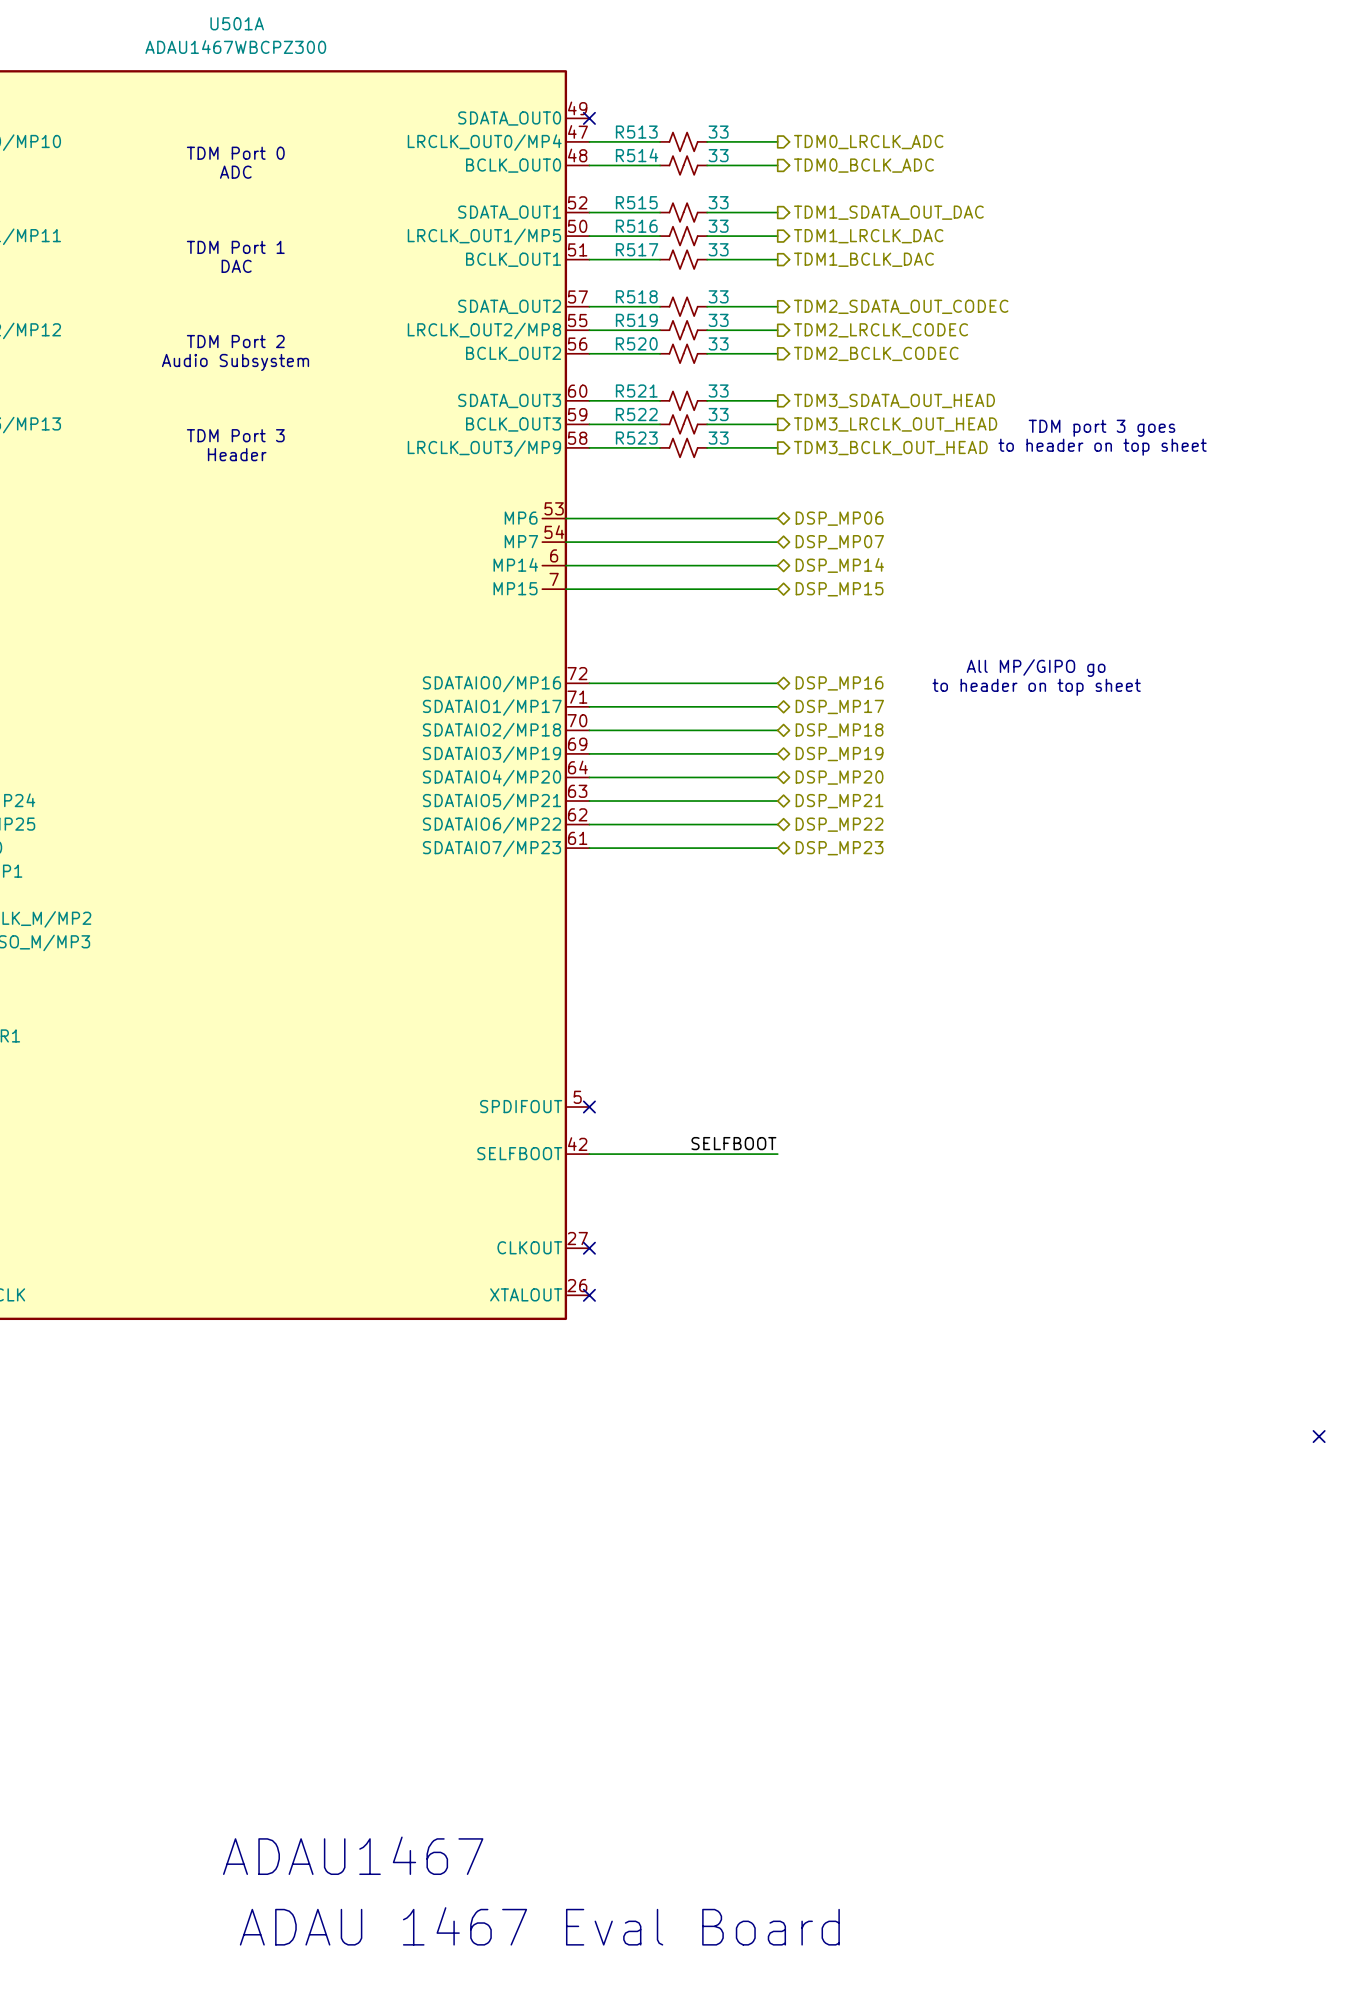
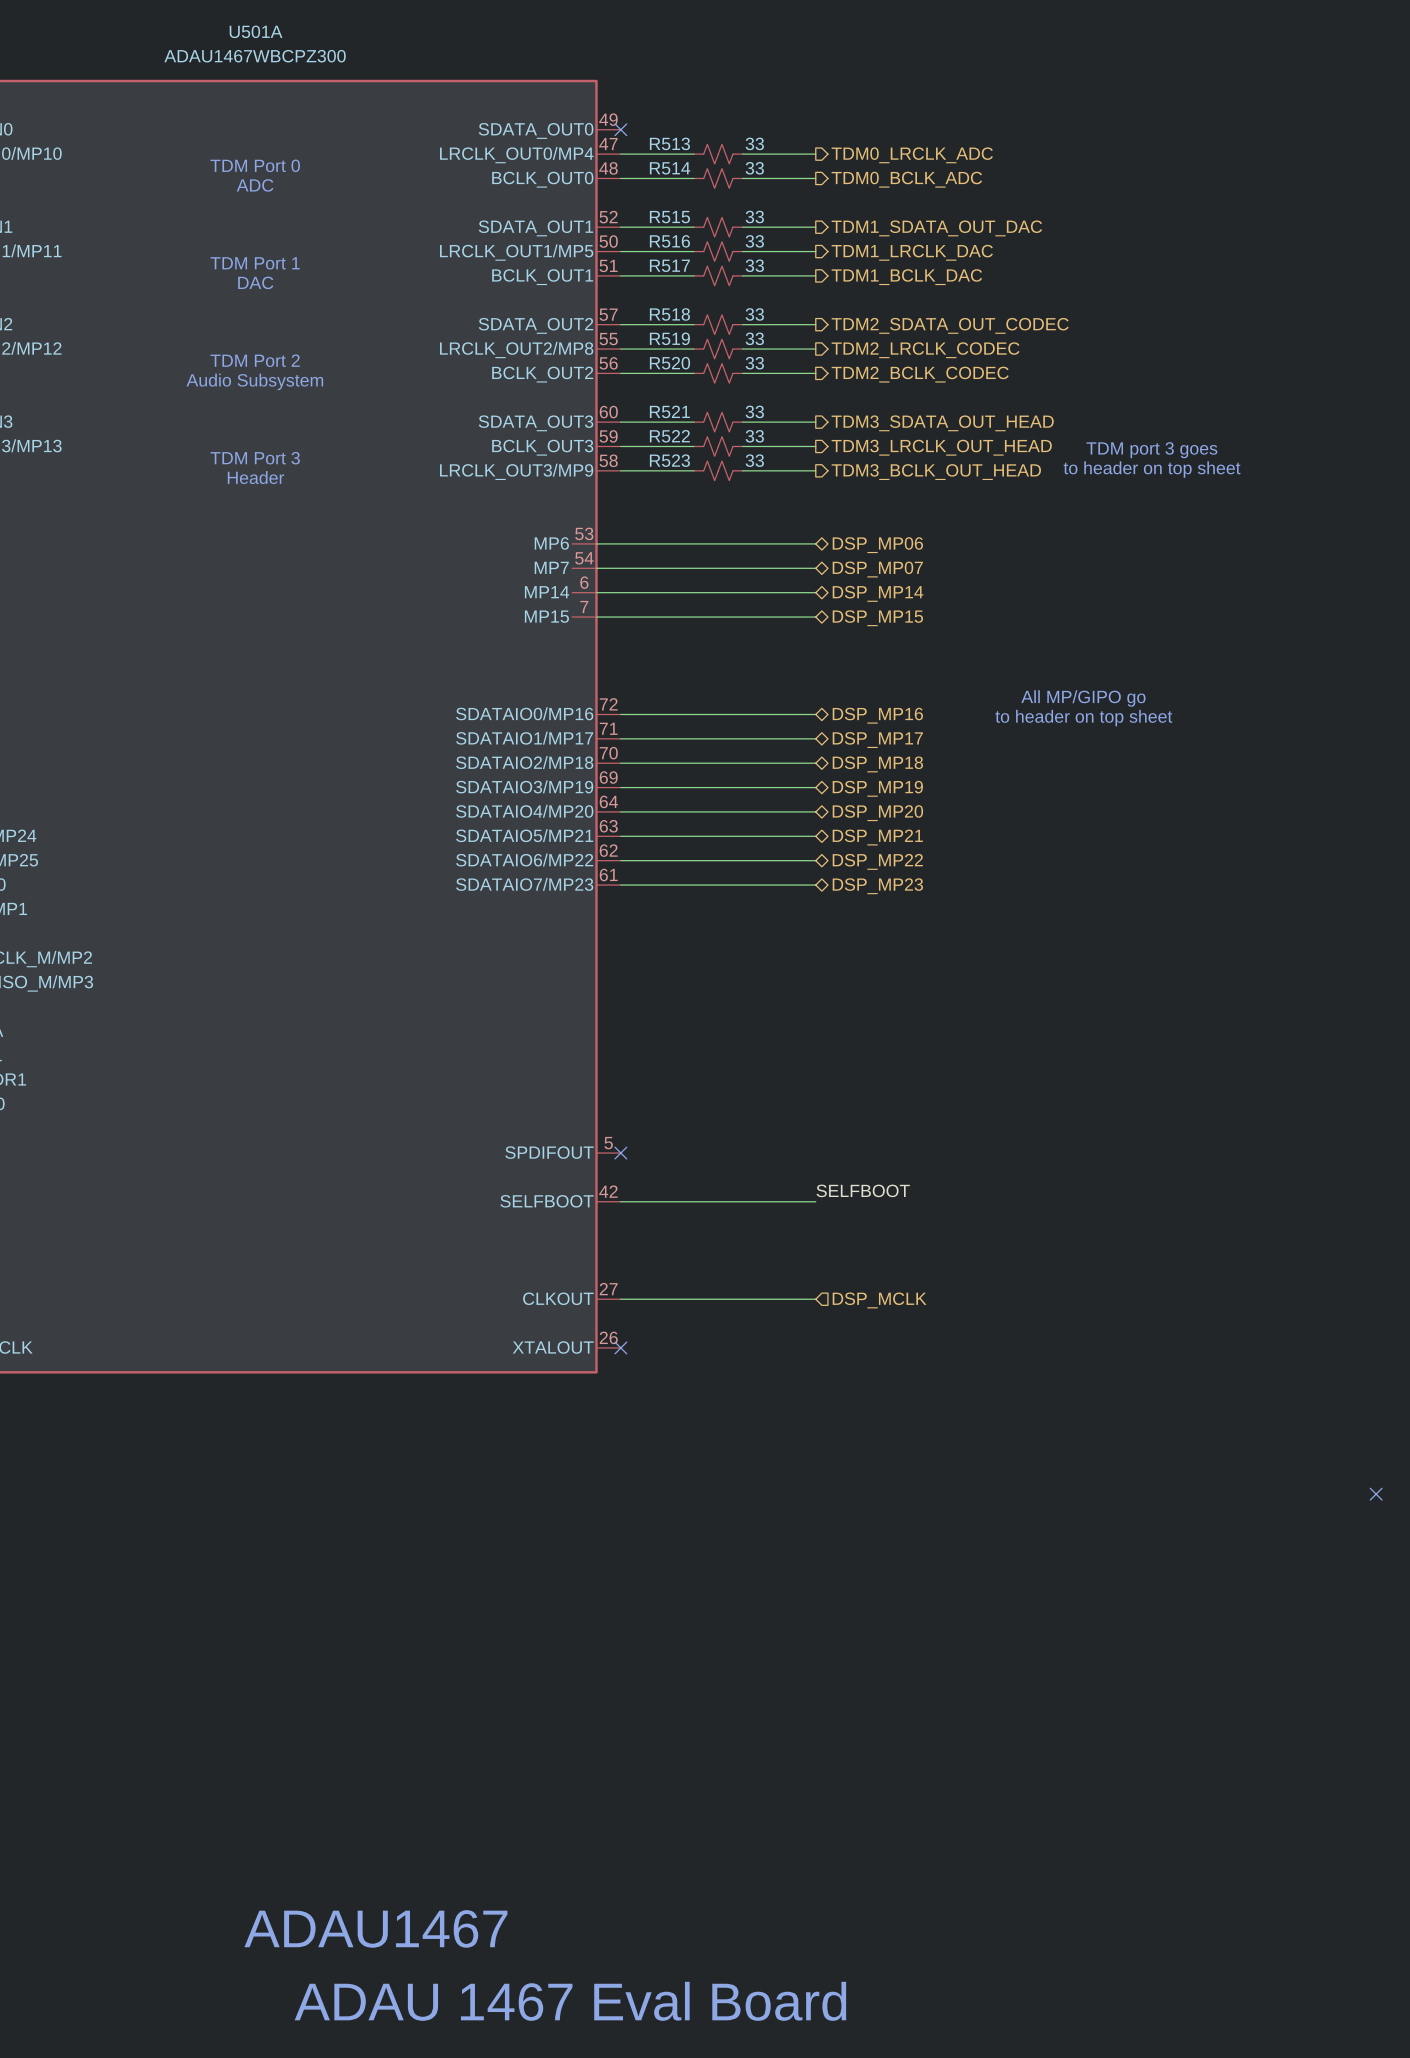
label position: SELFBOOT (733, 1143) -> SELFBOOT (863, 1190)
wire: none -> (620, 1299) (815, 1299)
no-connect mark: (589, 1248) -> none
hierarchical label: none -> DSP_MCLK (879, 1300)

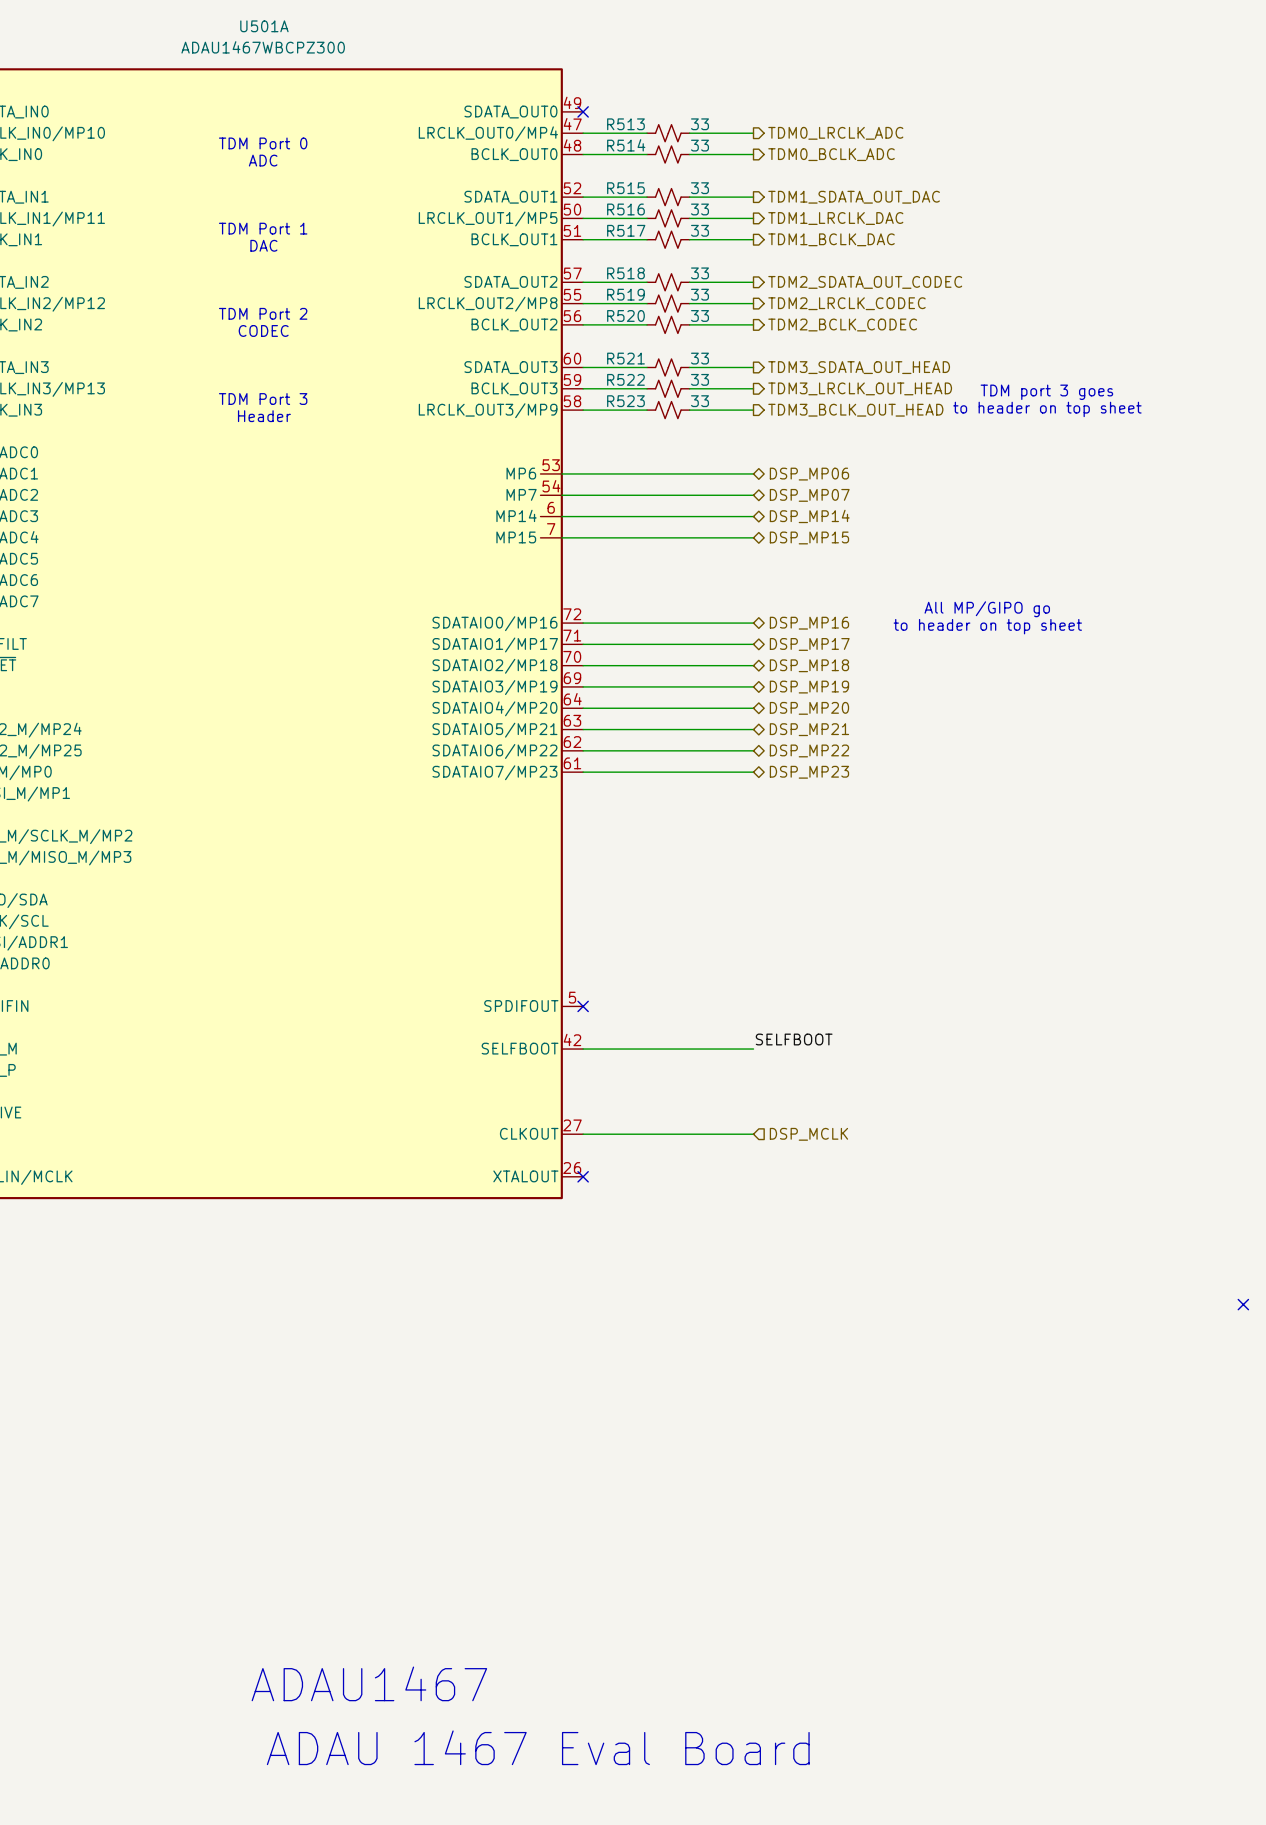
text: Audio Subsystem (254, 381) -> CODEC (263, 330)

